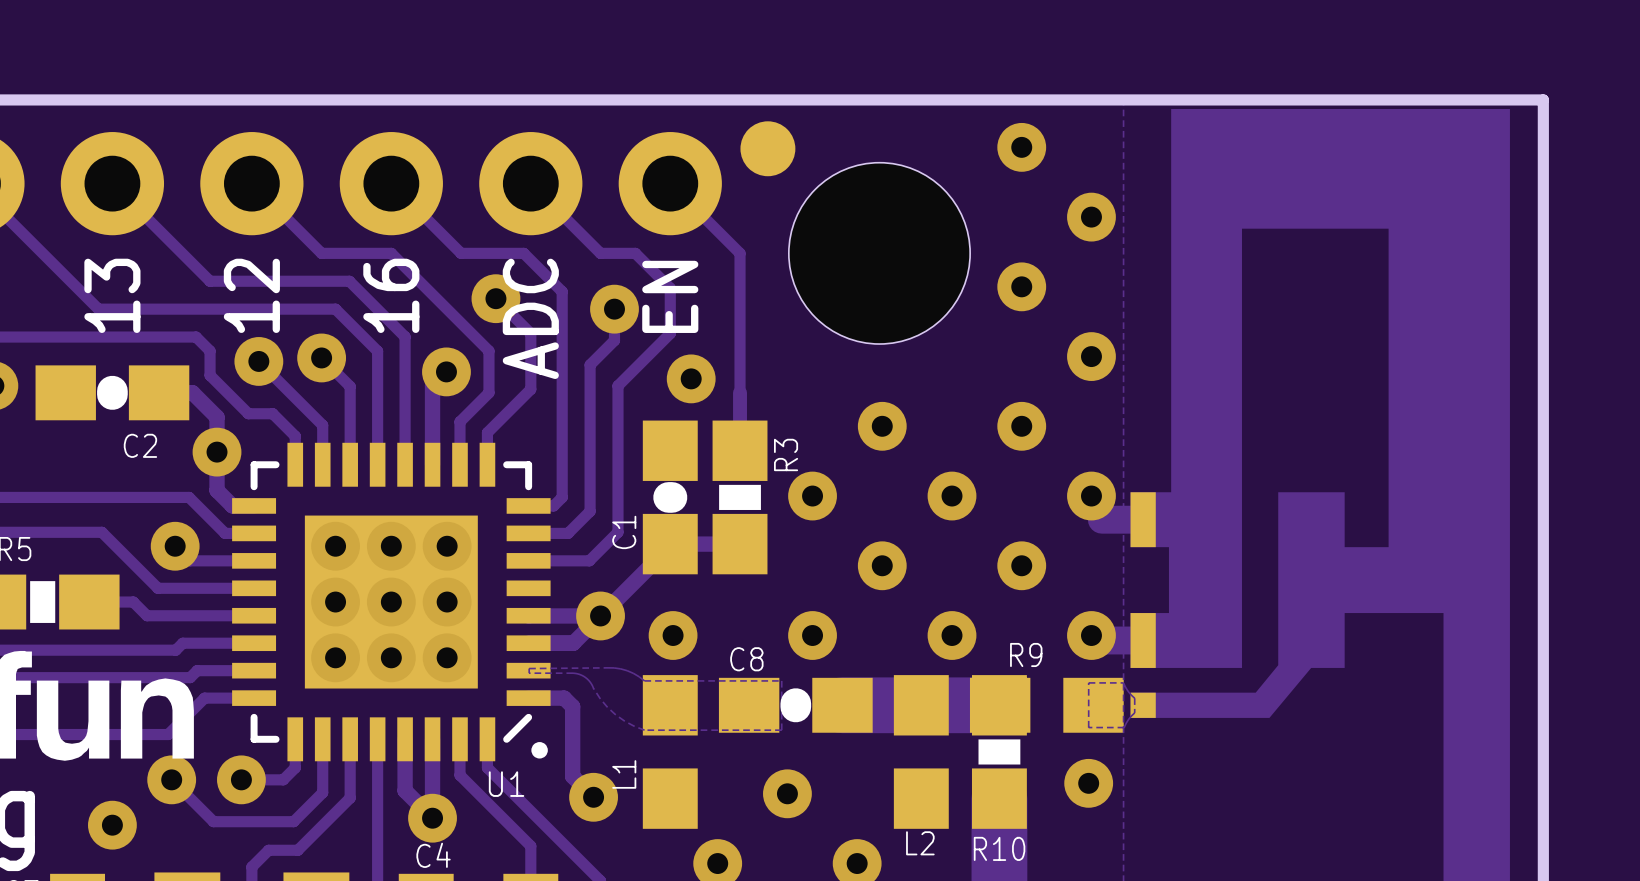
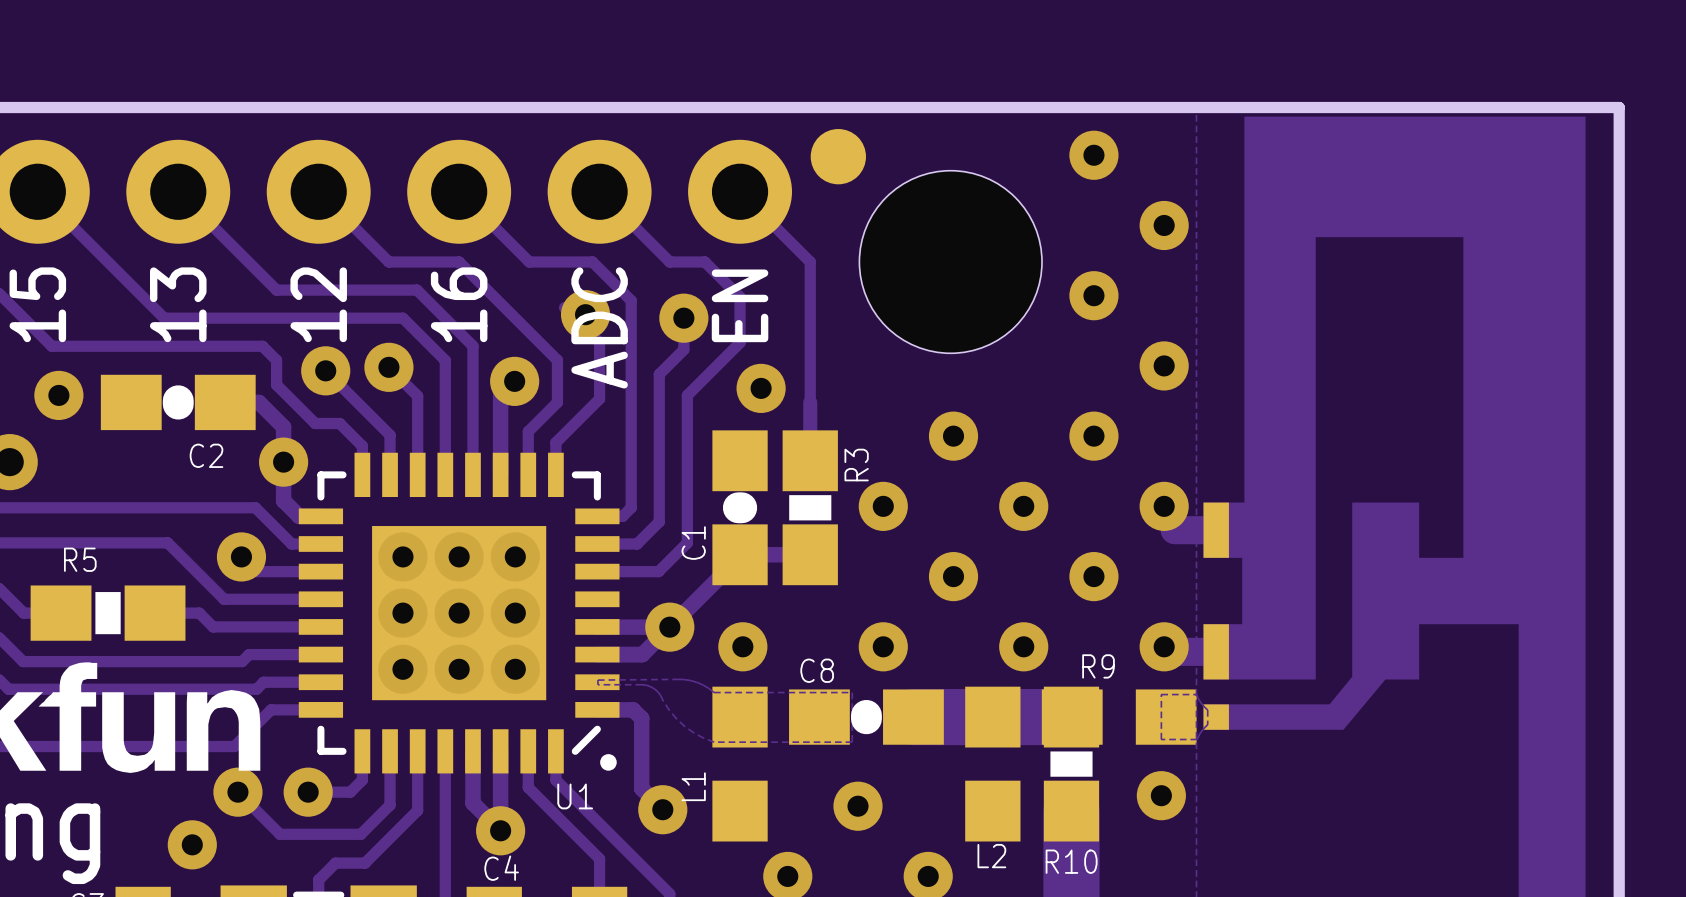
via position: (495, 298) -> (585, 314)
via position: (112, 825) -> (192, 844)

